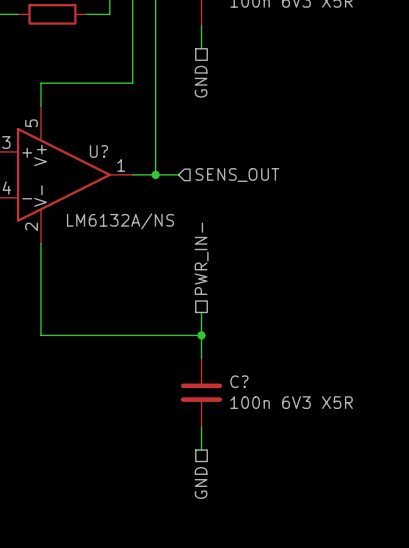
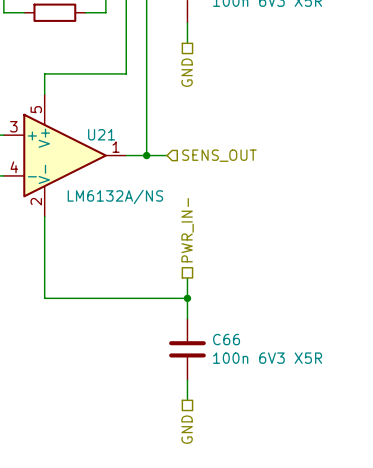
U? name: U? (98, 151) -> U21 (101, 134)
C? name: C? (239, 381) -> C66 (226, 339)

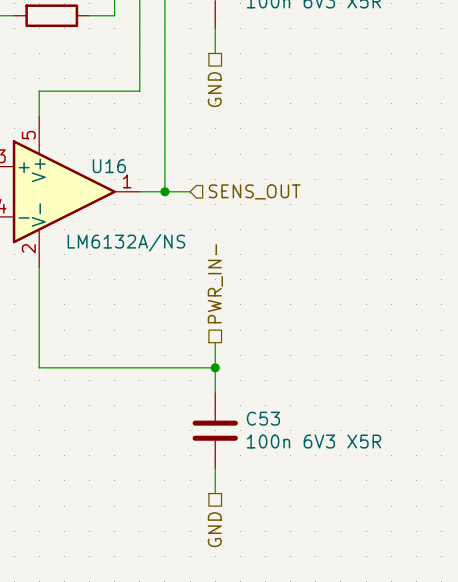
U21 name: U21 (101, 134) -> U16 (109, 166)
C66 name: C66 (226, 339) -> C53 (263, 418)

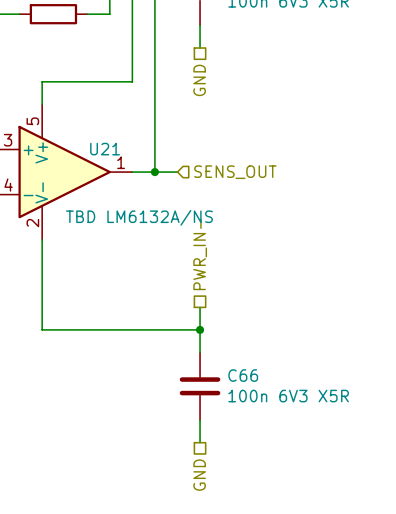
U16 name: U16 (109, 166) -> U21 (105, 149)
U16 value: LM6132A/NS (126, 242) -> TBD LM6132A/NS (139, 217)
C53 name: C53 (263, 418) -> C66 (243, 375)

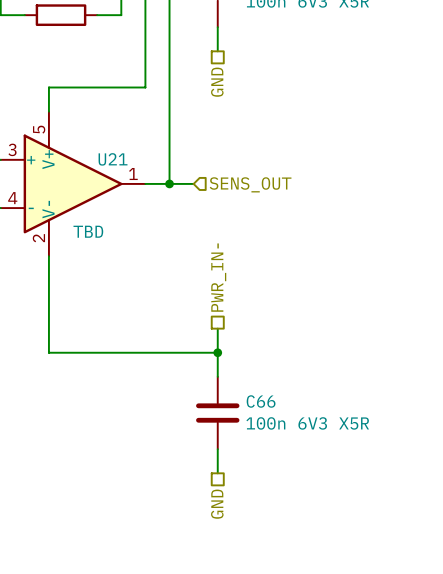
U21 value: TBD LM6132A/NS (139, 217) -> TBD (88, 231)

